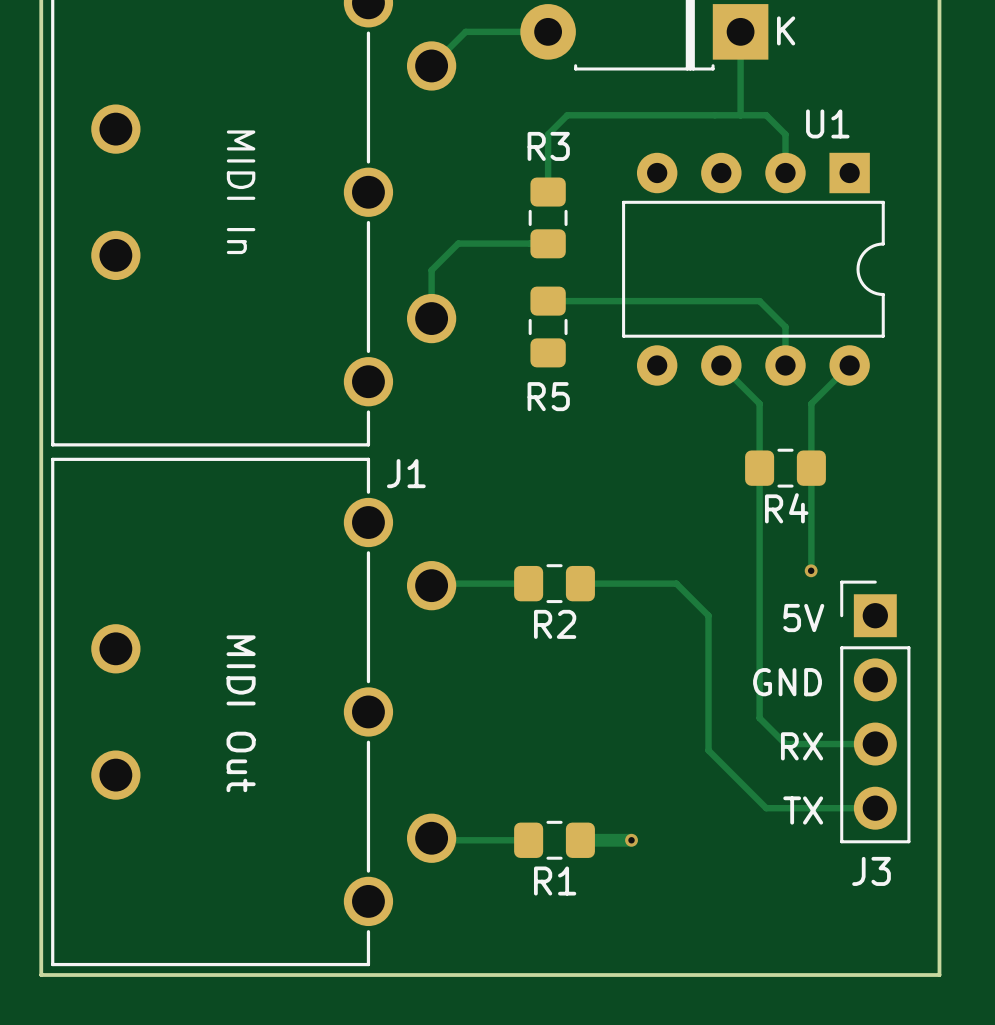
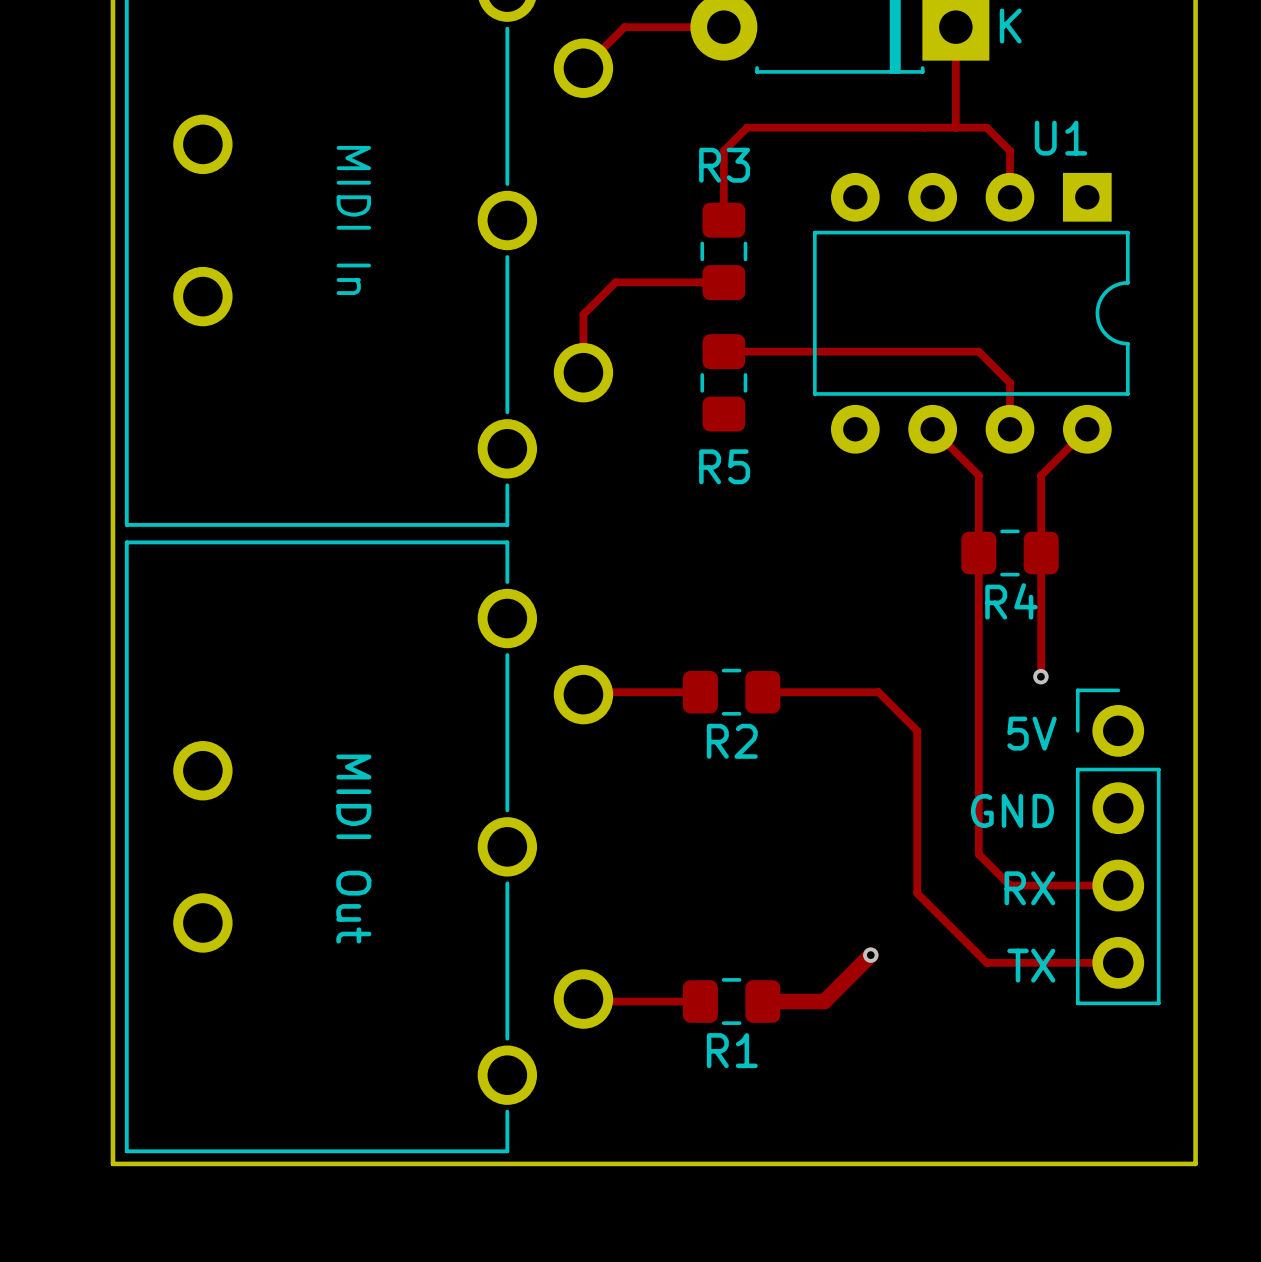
J1 name: J1 (406, 473) -> none
J3: (875, 711) -> none
part: none -> (1118, 846)
track: none -> (870, 955) (824, 1001)
via position: (631, 840) -> (870, 955)

